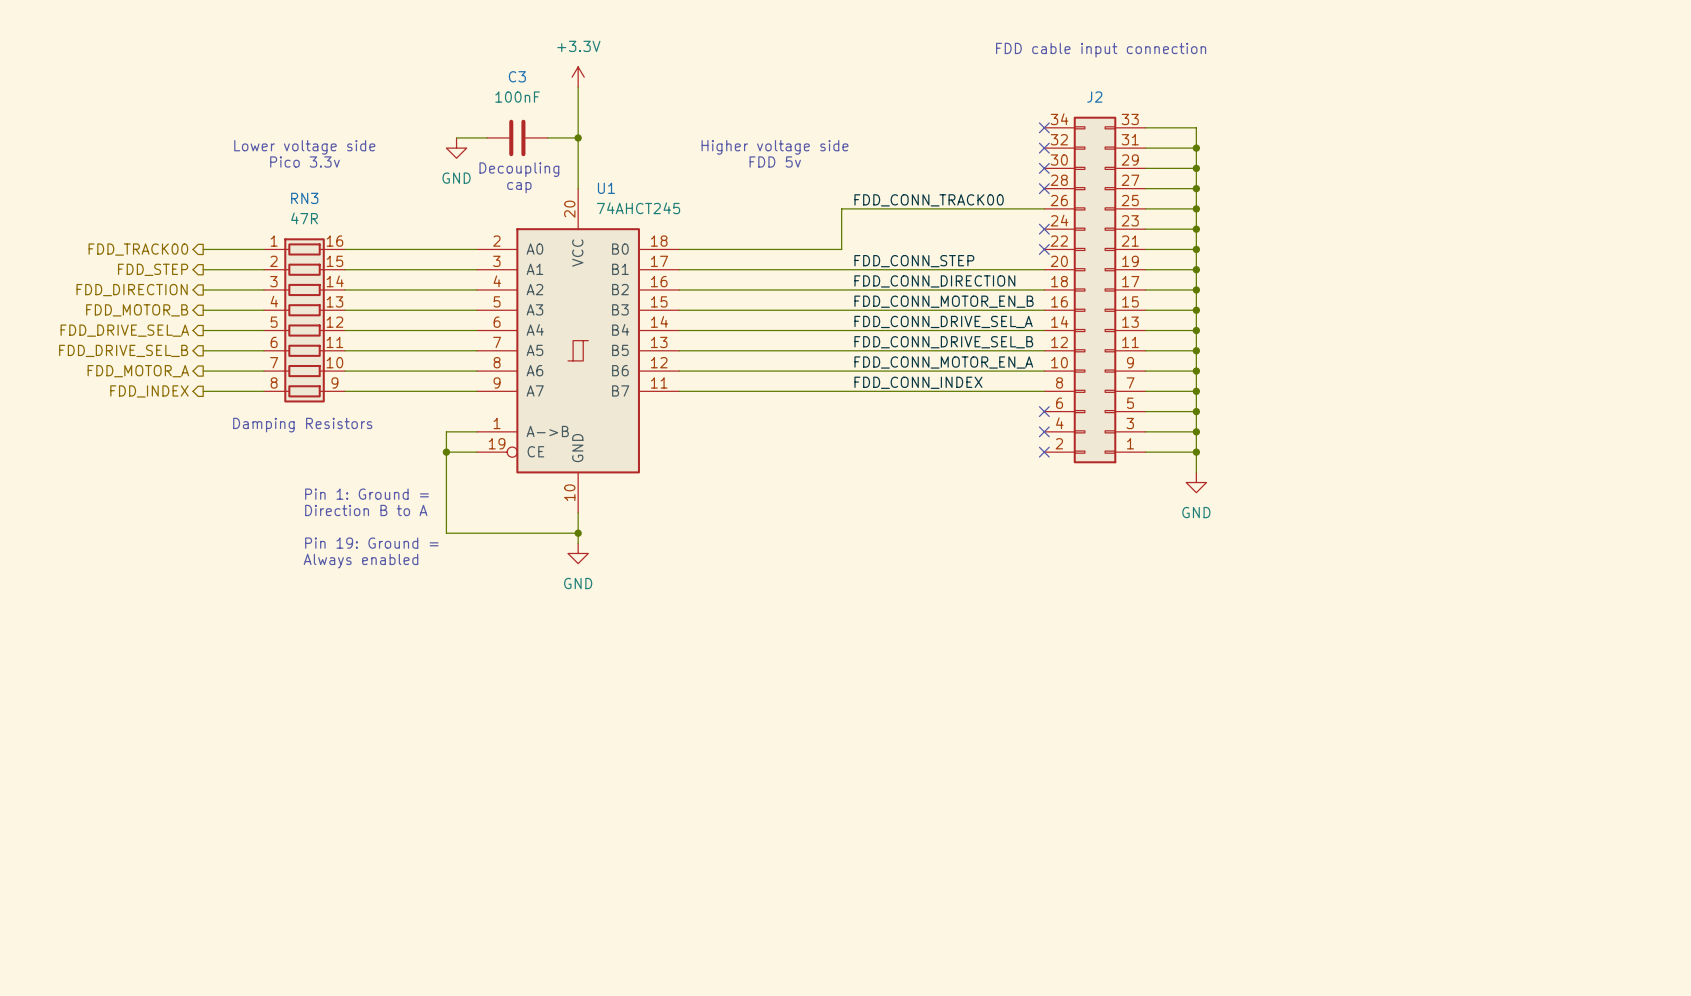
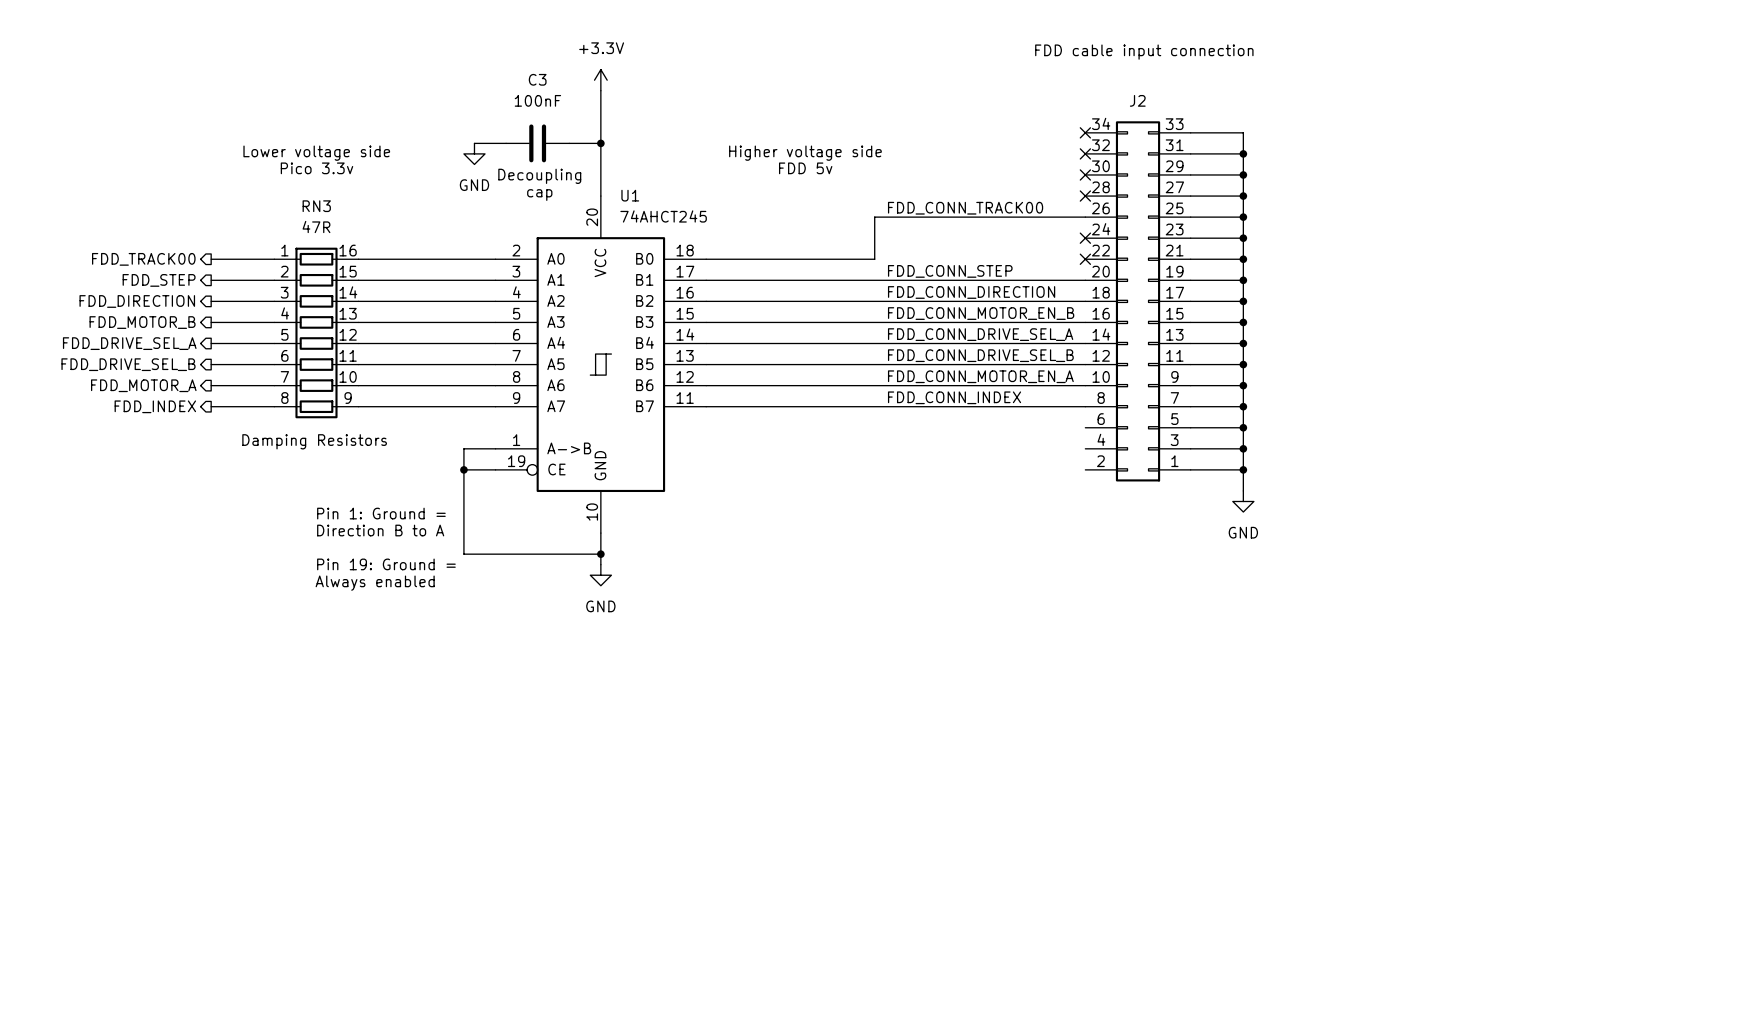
no-connect mark: (1044, 411) -> none
no-connect mark: (1044, 431) -> none
no-connect mark: (1044, 452) -> none

